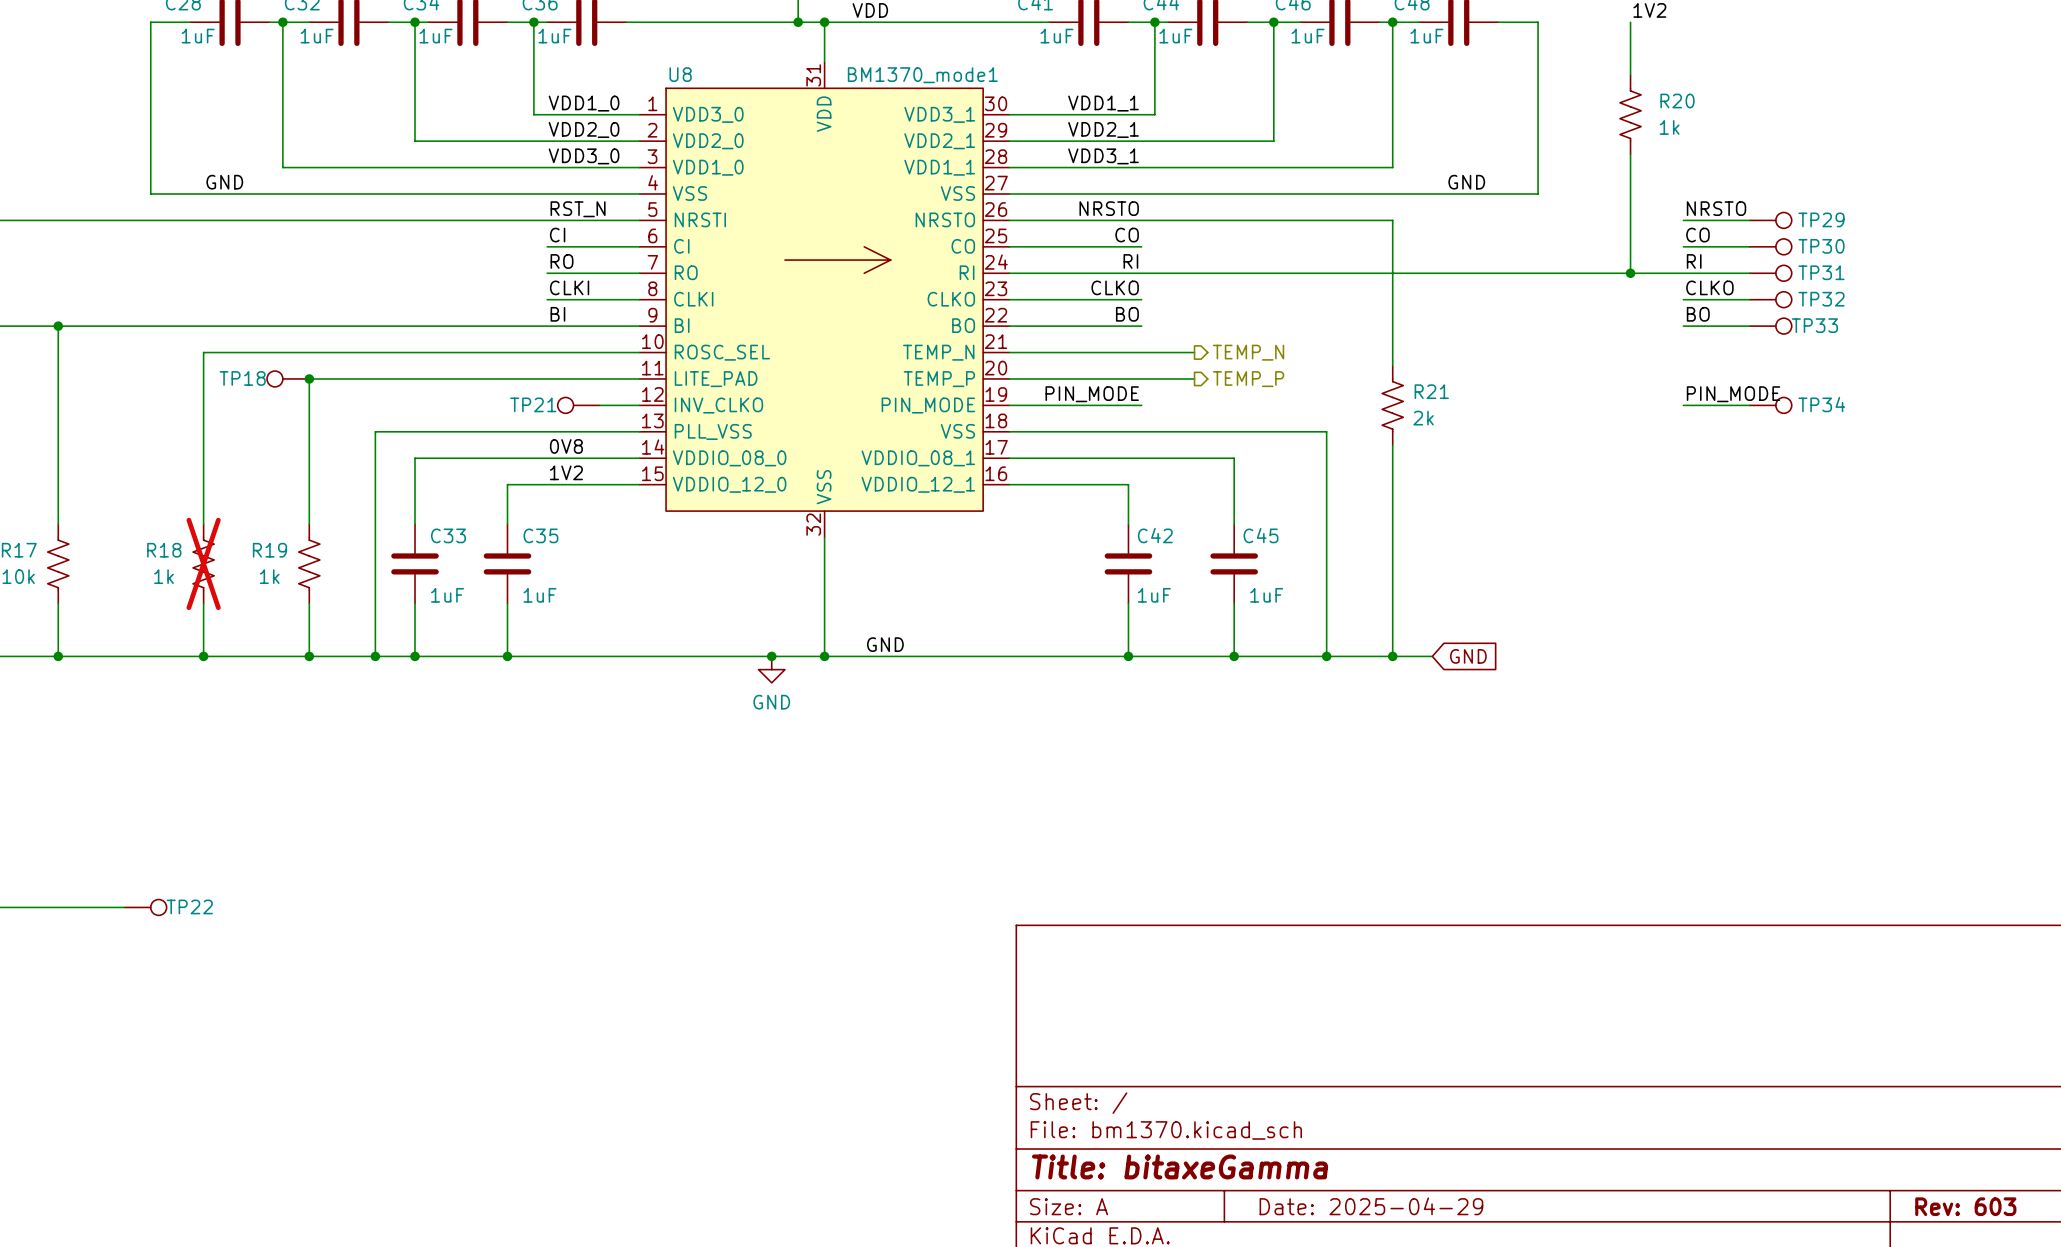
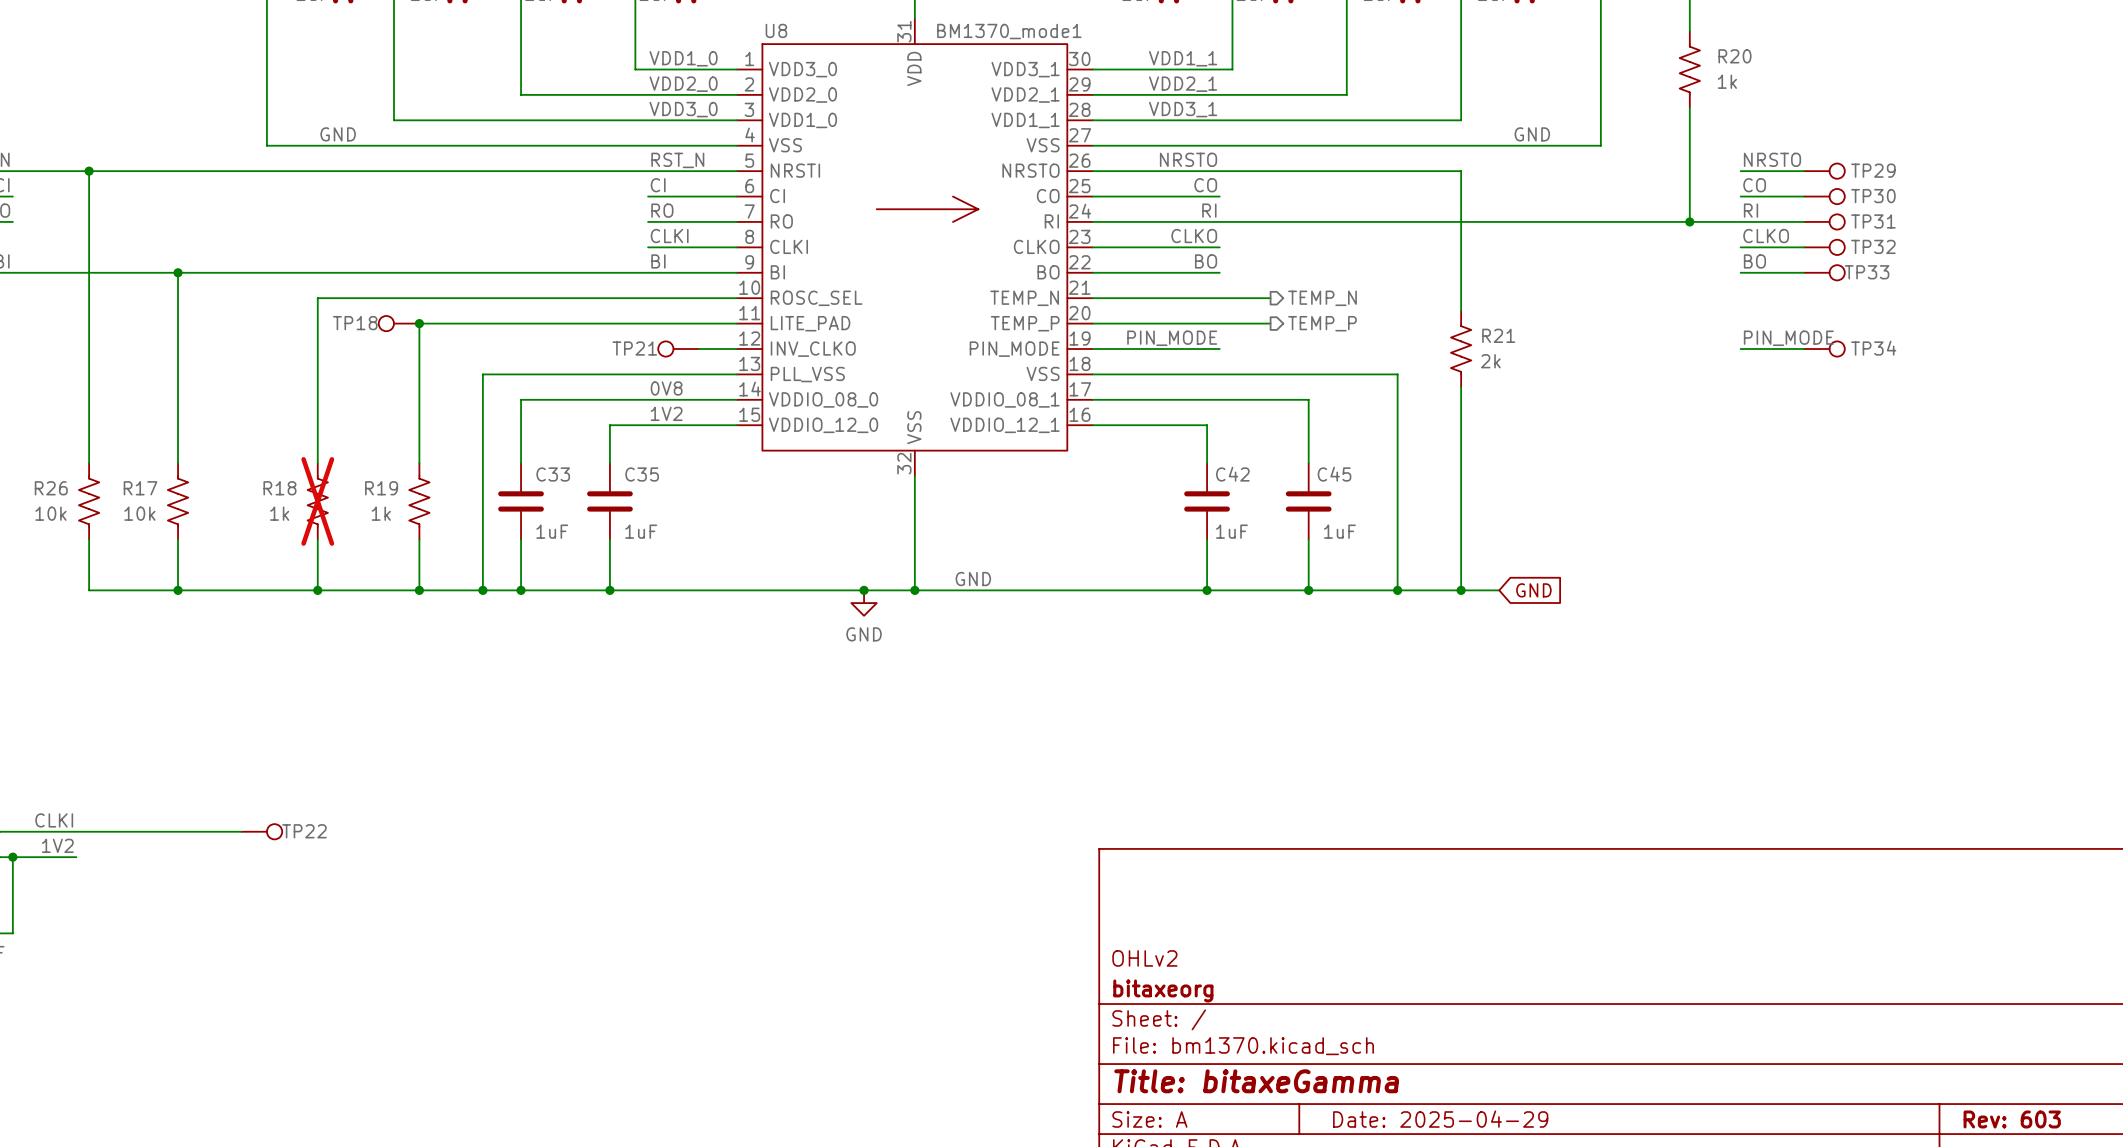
title block: none -> OHLv2 (1144, 958)
title block: none -> bitaxeorg (1163, 990)

